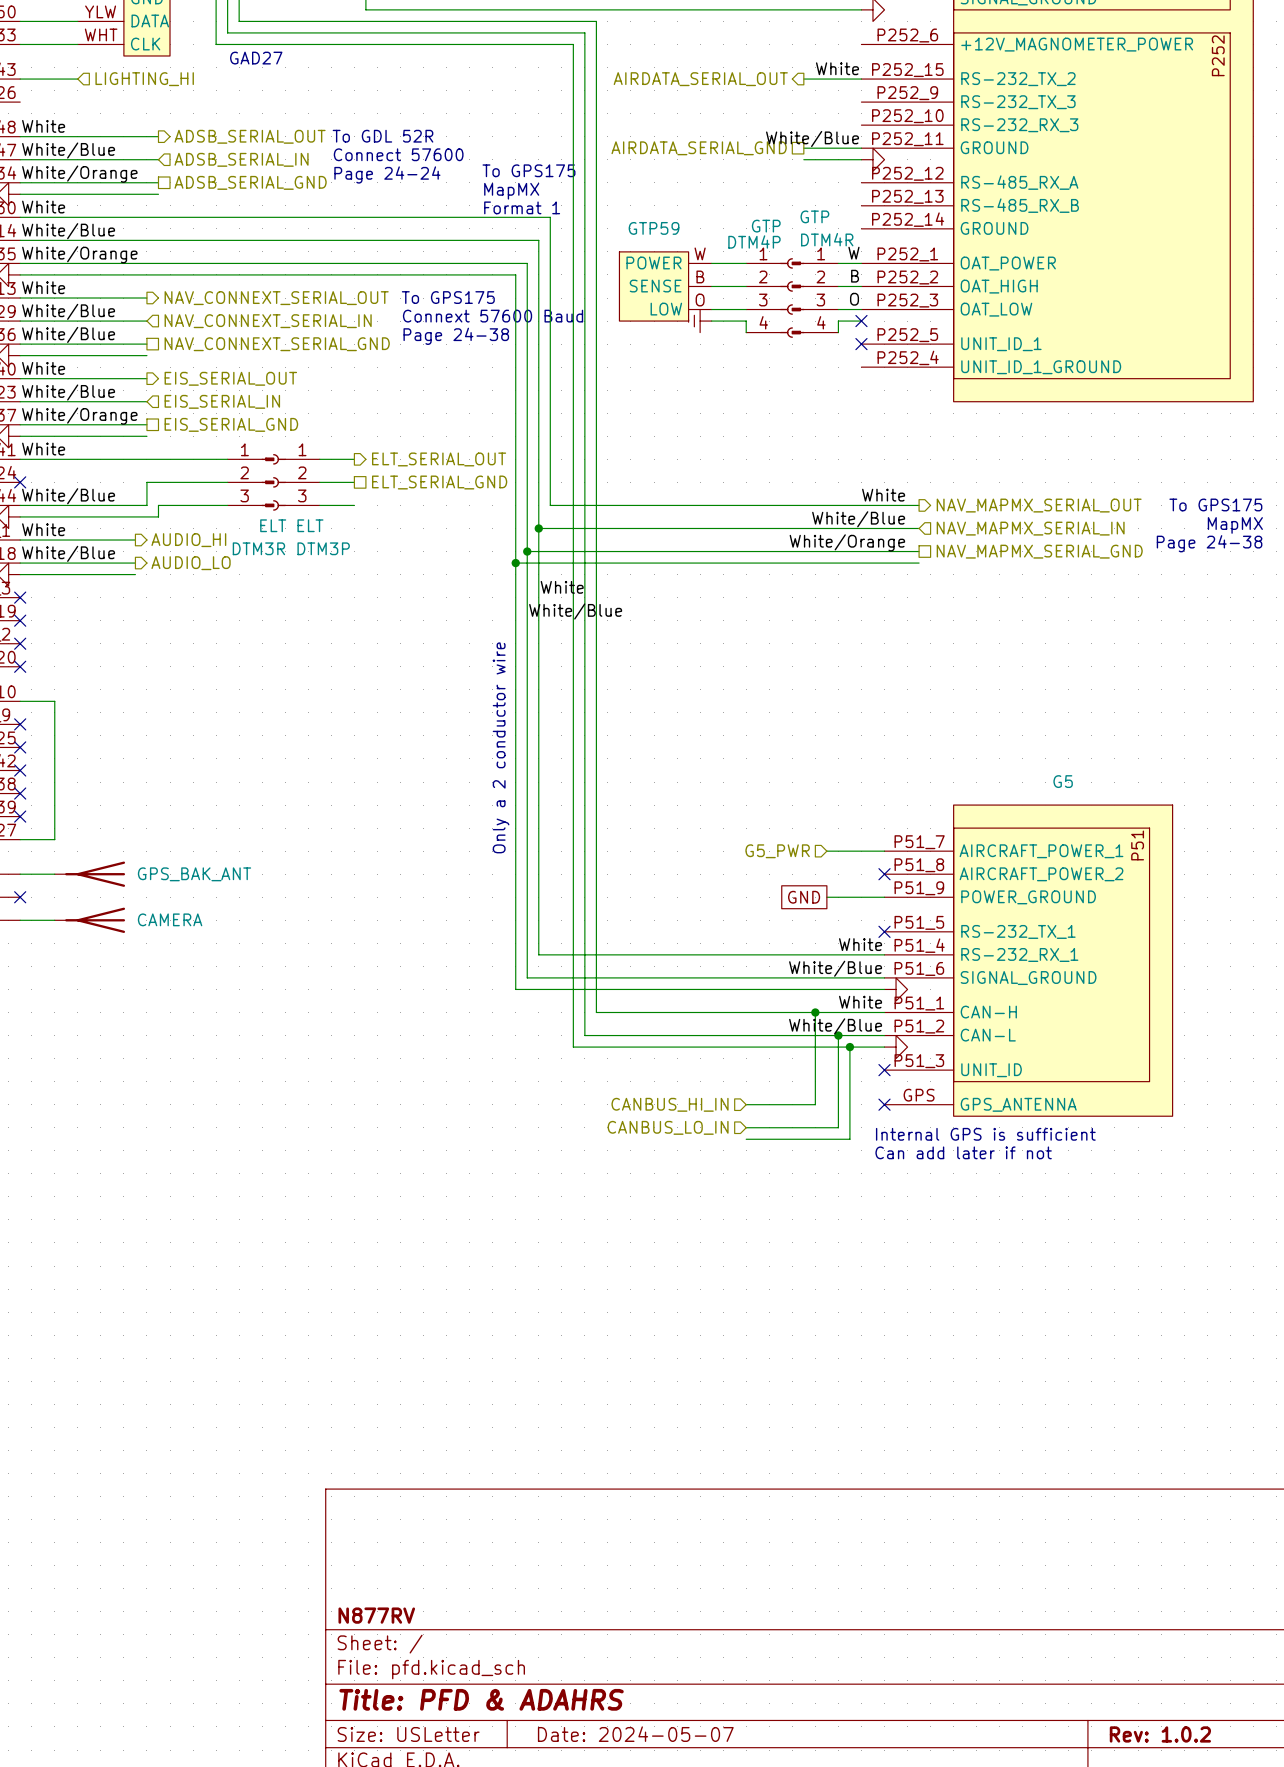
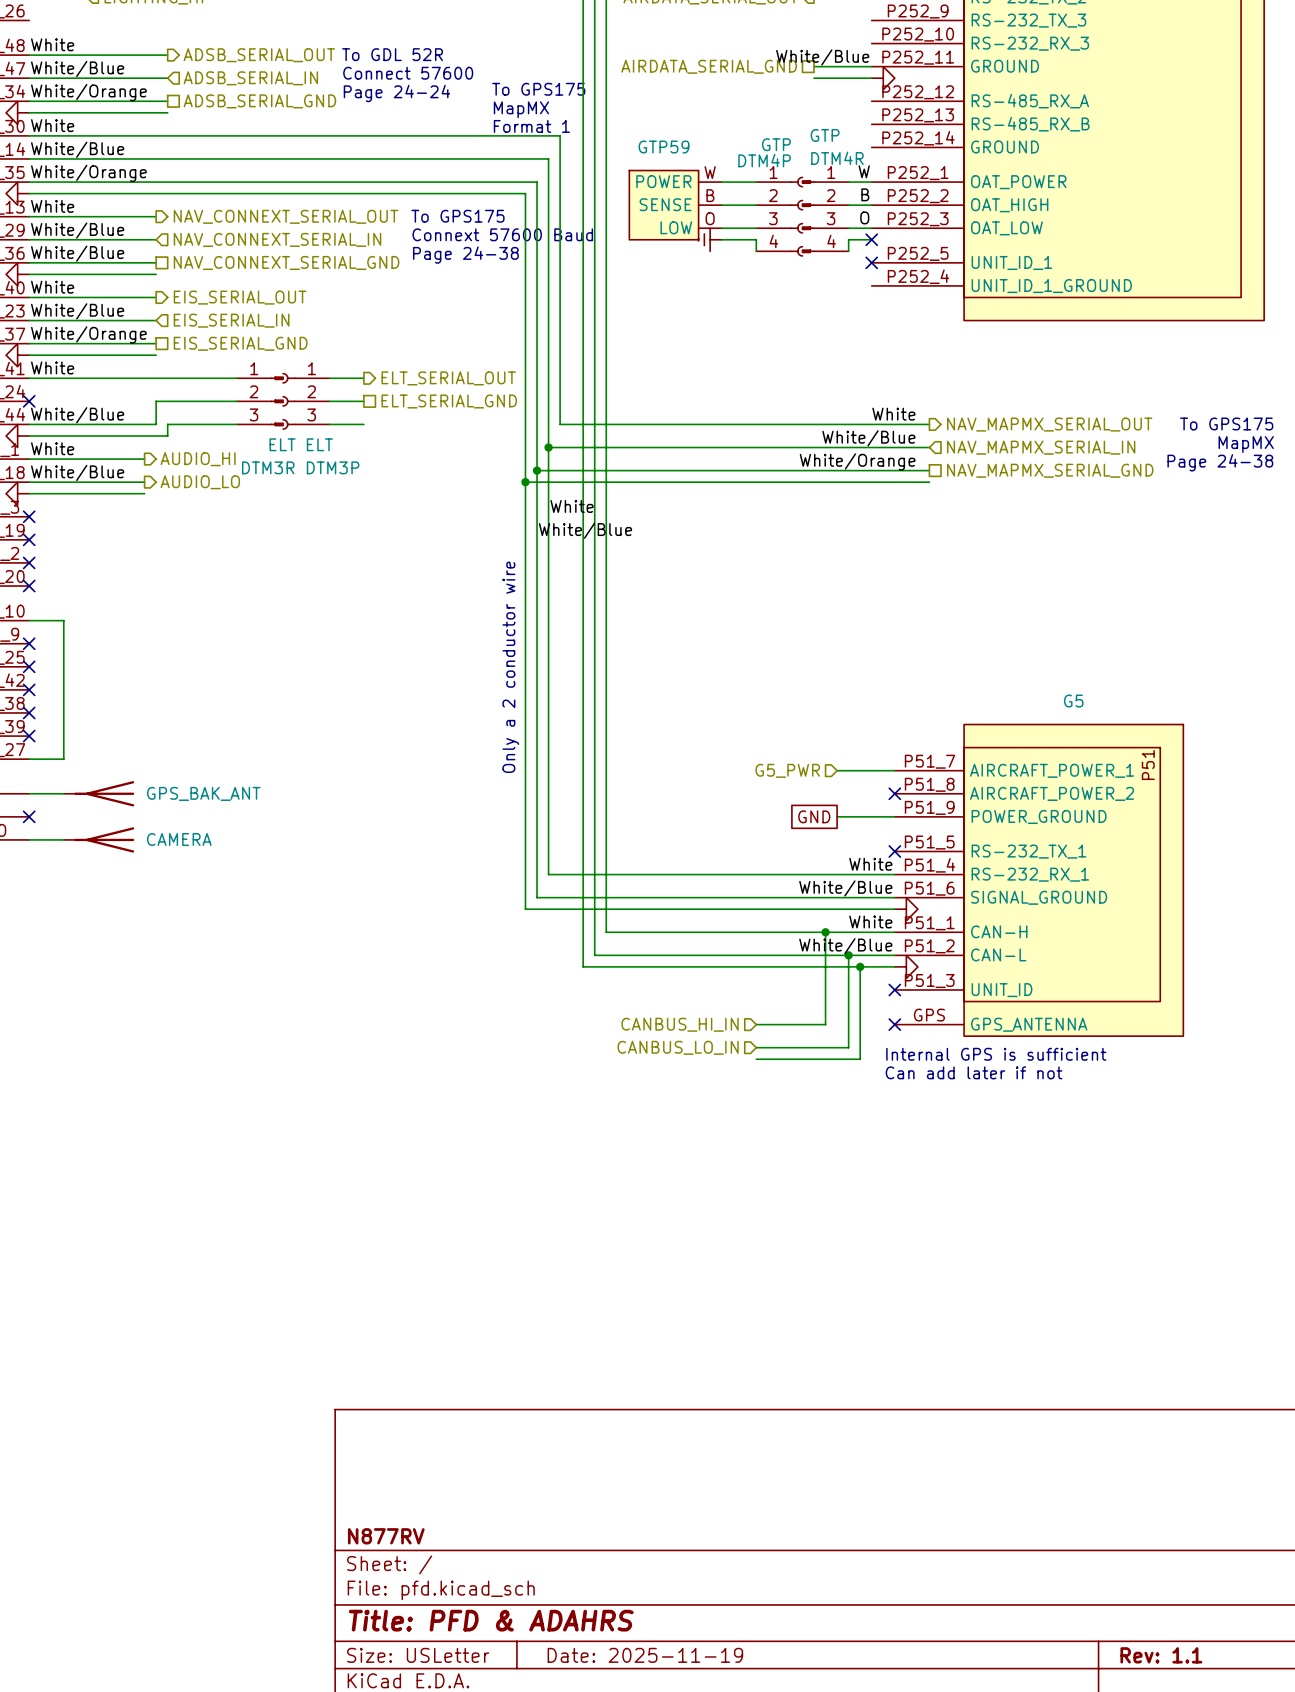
title block: Date: 2024-05-07 (635, 1734) -> Date: 2025-11-19 (645, 1655)
title block: Rev: 1.0.2 (1160, 1734) -> Rev: 1.1 (1161, 1655)

